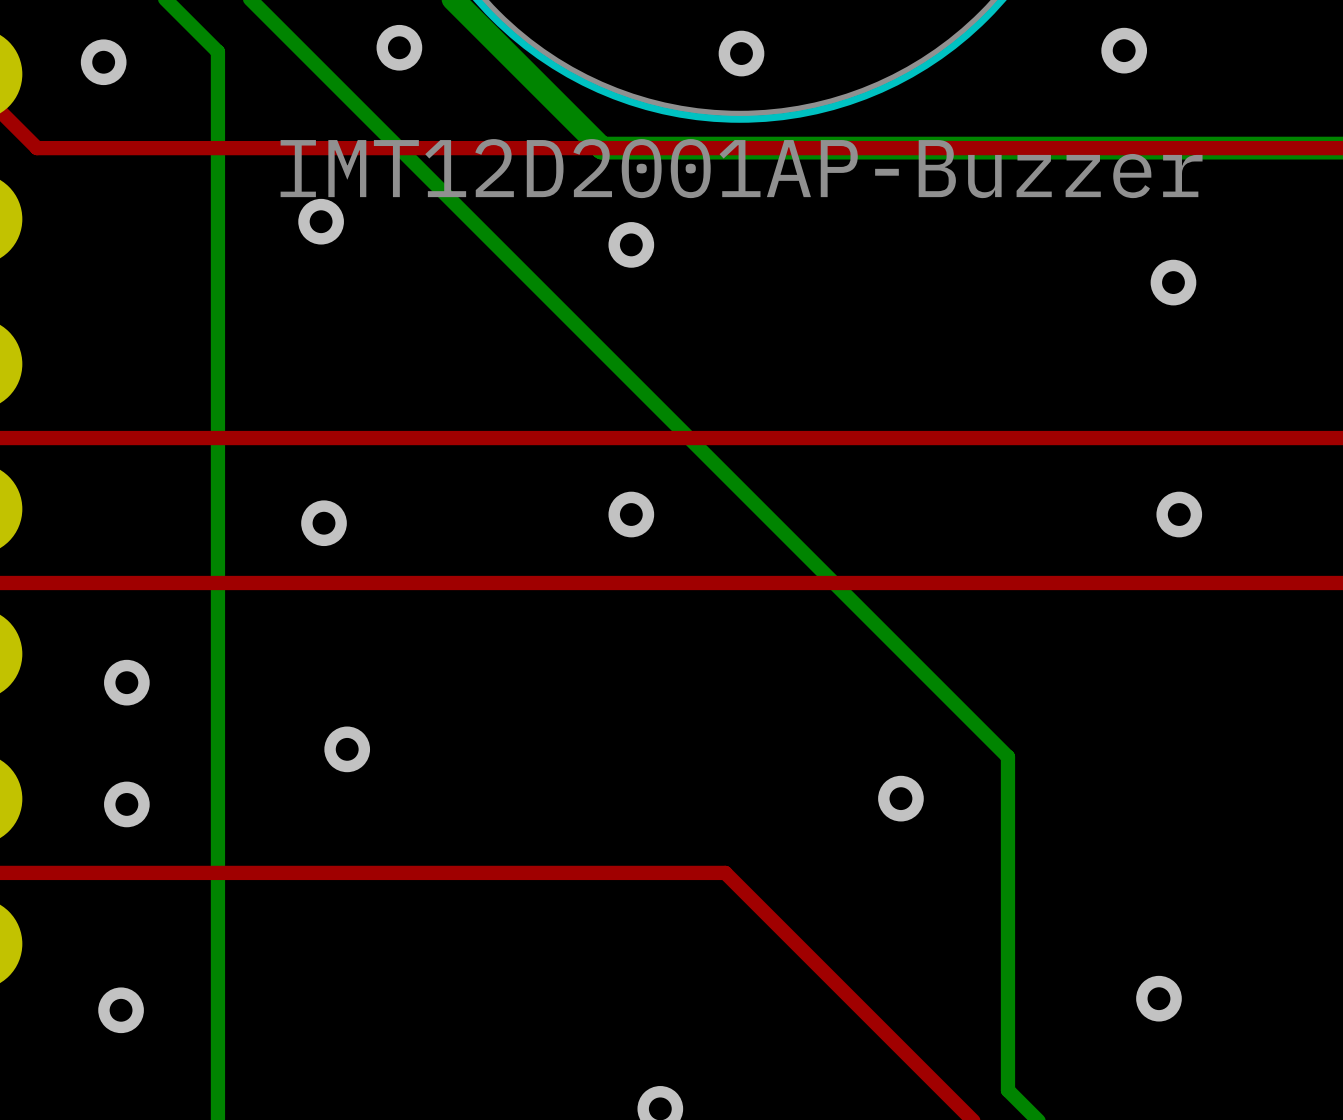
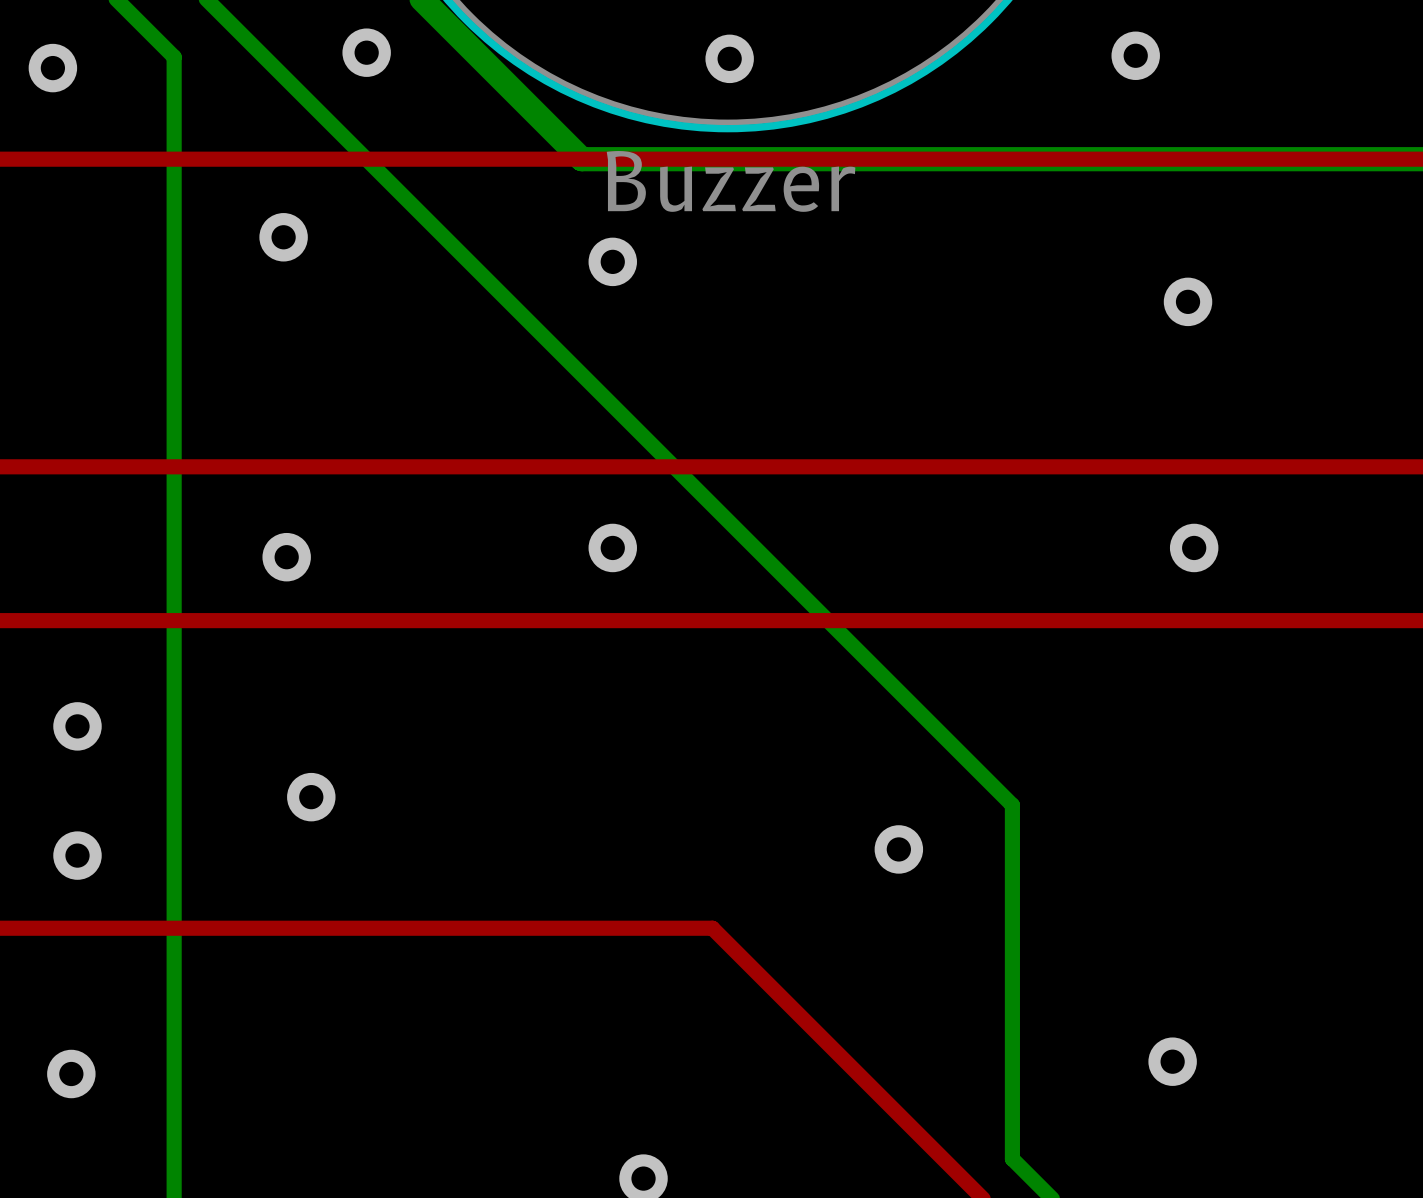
part value: IMT12D2001AP-Buzzer (741, 168) -> Buzzer (731, 181)

